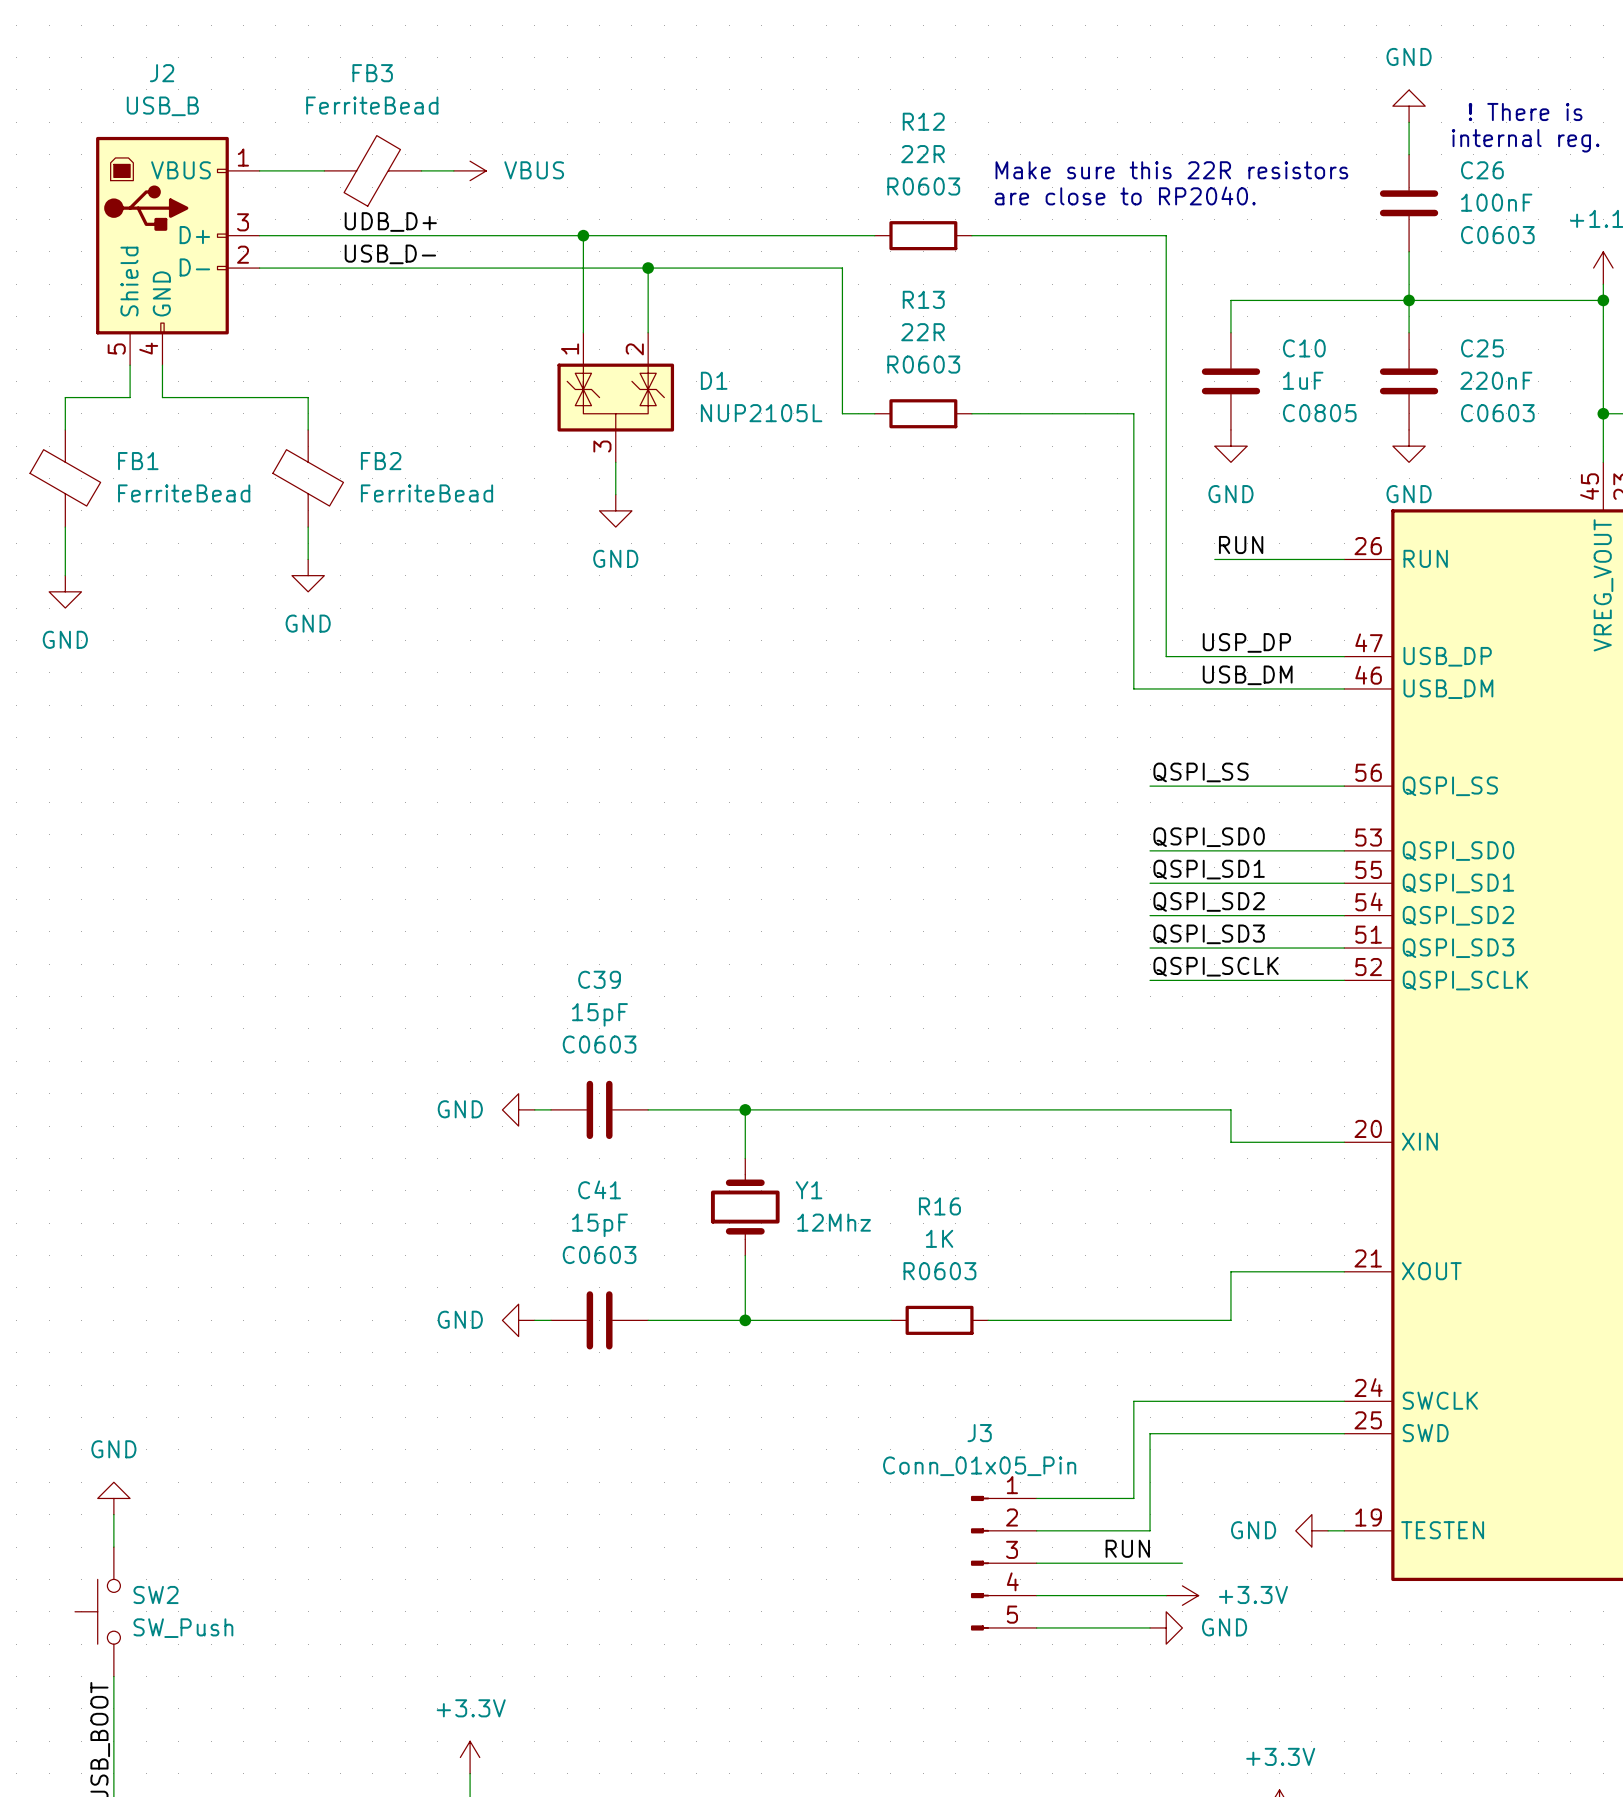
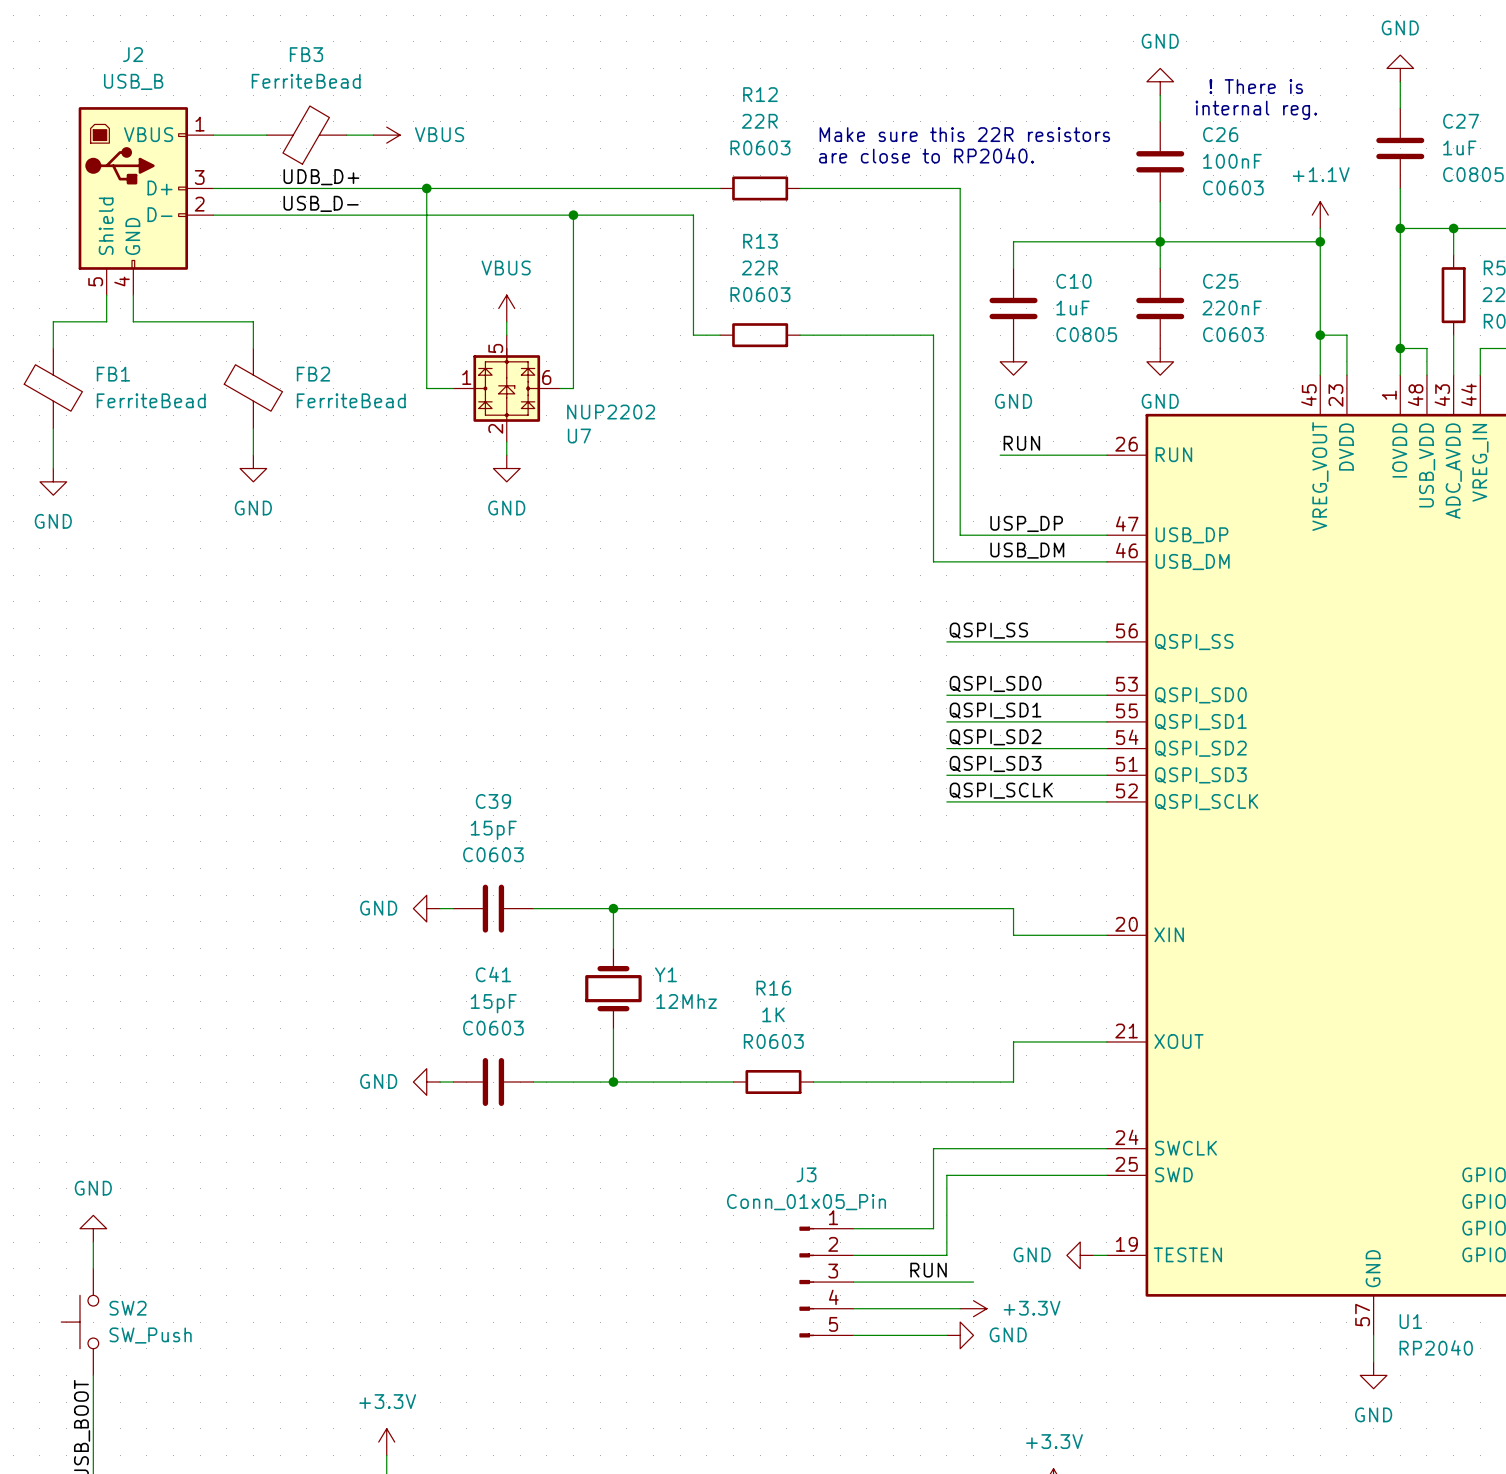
wire: none -> (426, 188) (426, 388) (453, 388)
junction: none -> (426, 188)
wire: (583, 235) (583, 332) -> none
junction: (583, 235) -> none
wire: (648, 268) (648, 332) -> none
junction position: (648, 268) -> (573, 215)
wire: none -> (573, 215) (573, 388) (560, 388)
power symbol: none -> VBUS (506, 308)
D1: NUP2105L (615, 397) -> none
U7: none -> NUP2202 (506, 388)
power symbol position: GND (615, 510) -> GND (506, 468)
wire: none -> (506, 441) (506, 455)

